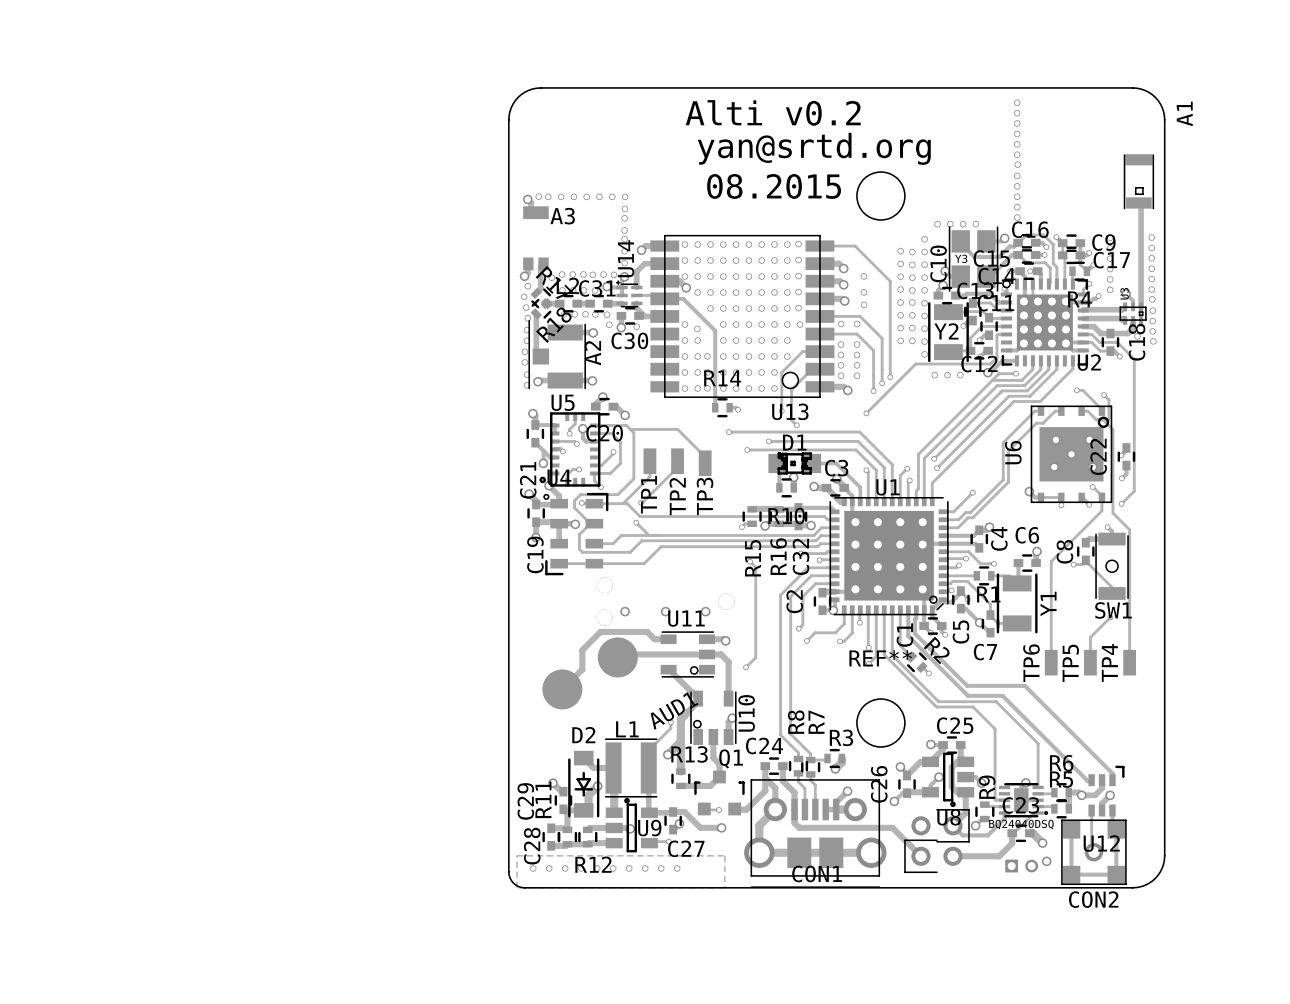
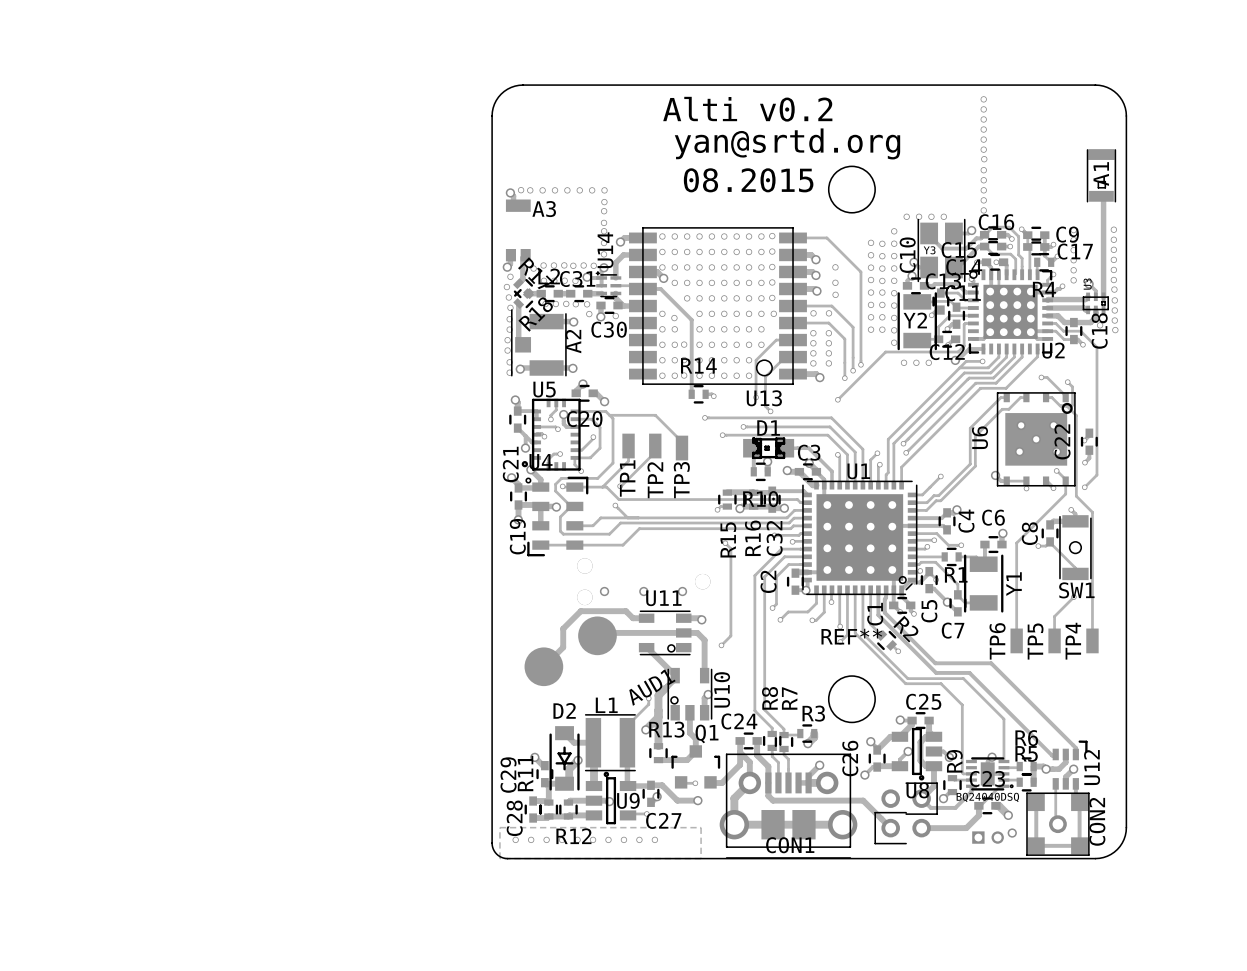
A1 name position: A1 (1184, 113) -> A1 (1101, 173)
U12 name rotation: 0° (1101, 843) -> 90° counterclockwise (1092, 767)
U12 name position: U12 (1101, 843) -> U12 (1092, 767)
CON2 name rotation: 0° (1093, 899) -> 90° counterclockwise (1097, 821)

